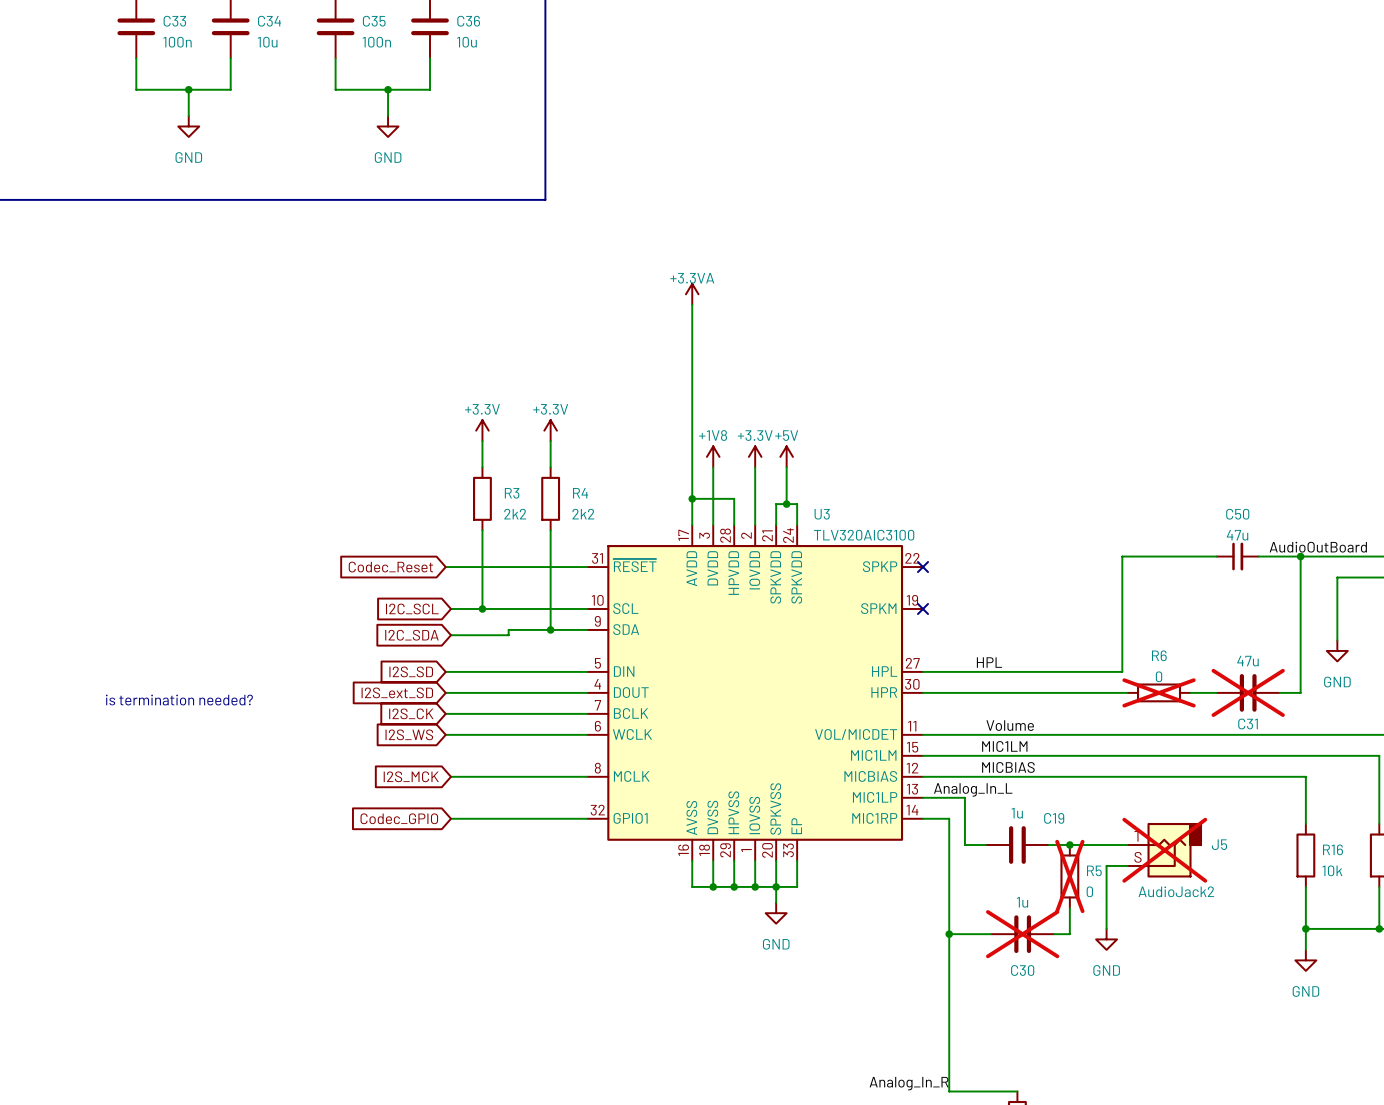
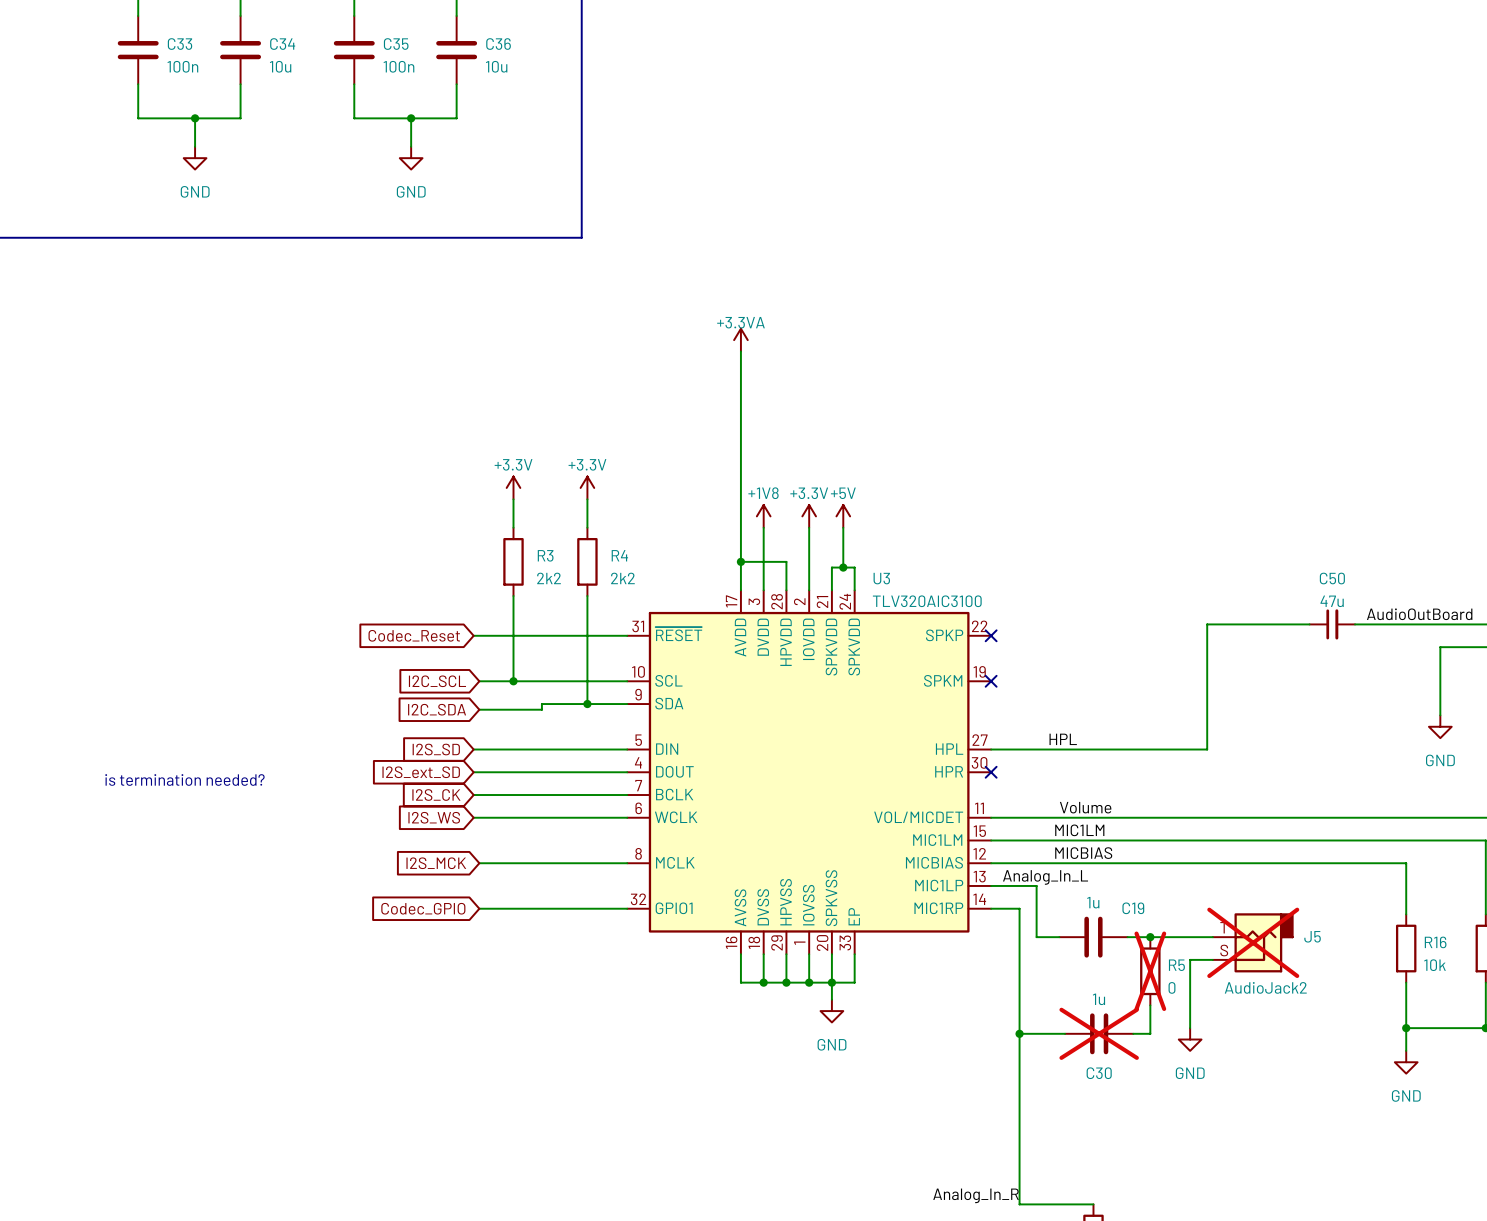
wire: (1300, 556) (1300, 692) (1279, 692) -> none
junction: (1300, 556) -> none
wire: (923, 692) (1127, 692) -> none
no-connect mark: none -> (991, 772)
R6: 0 (1159, 692) -> none
wire: (1190, 692) (1216, 692) -> none
C31: 47u (1248, 692) -> none

